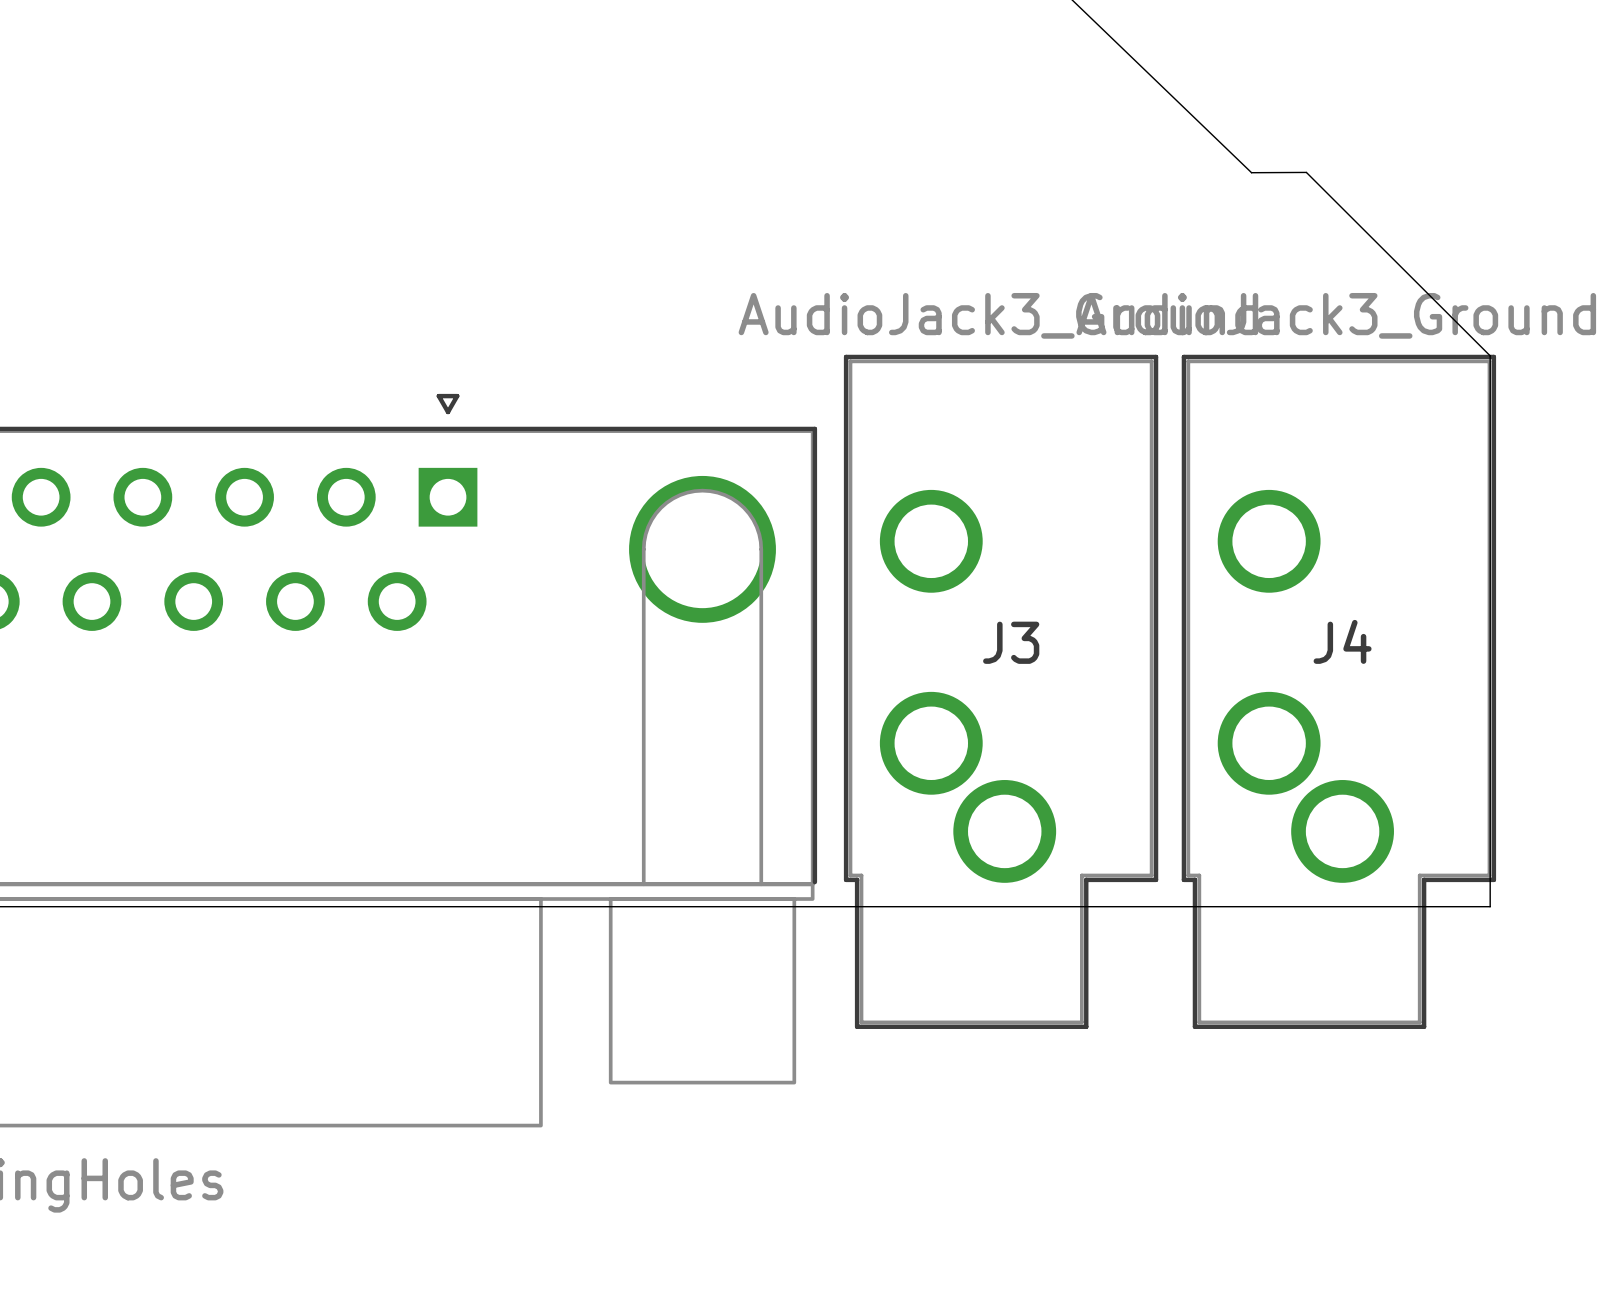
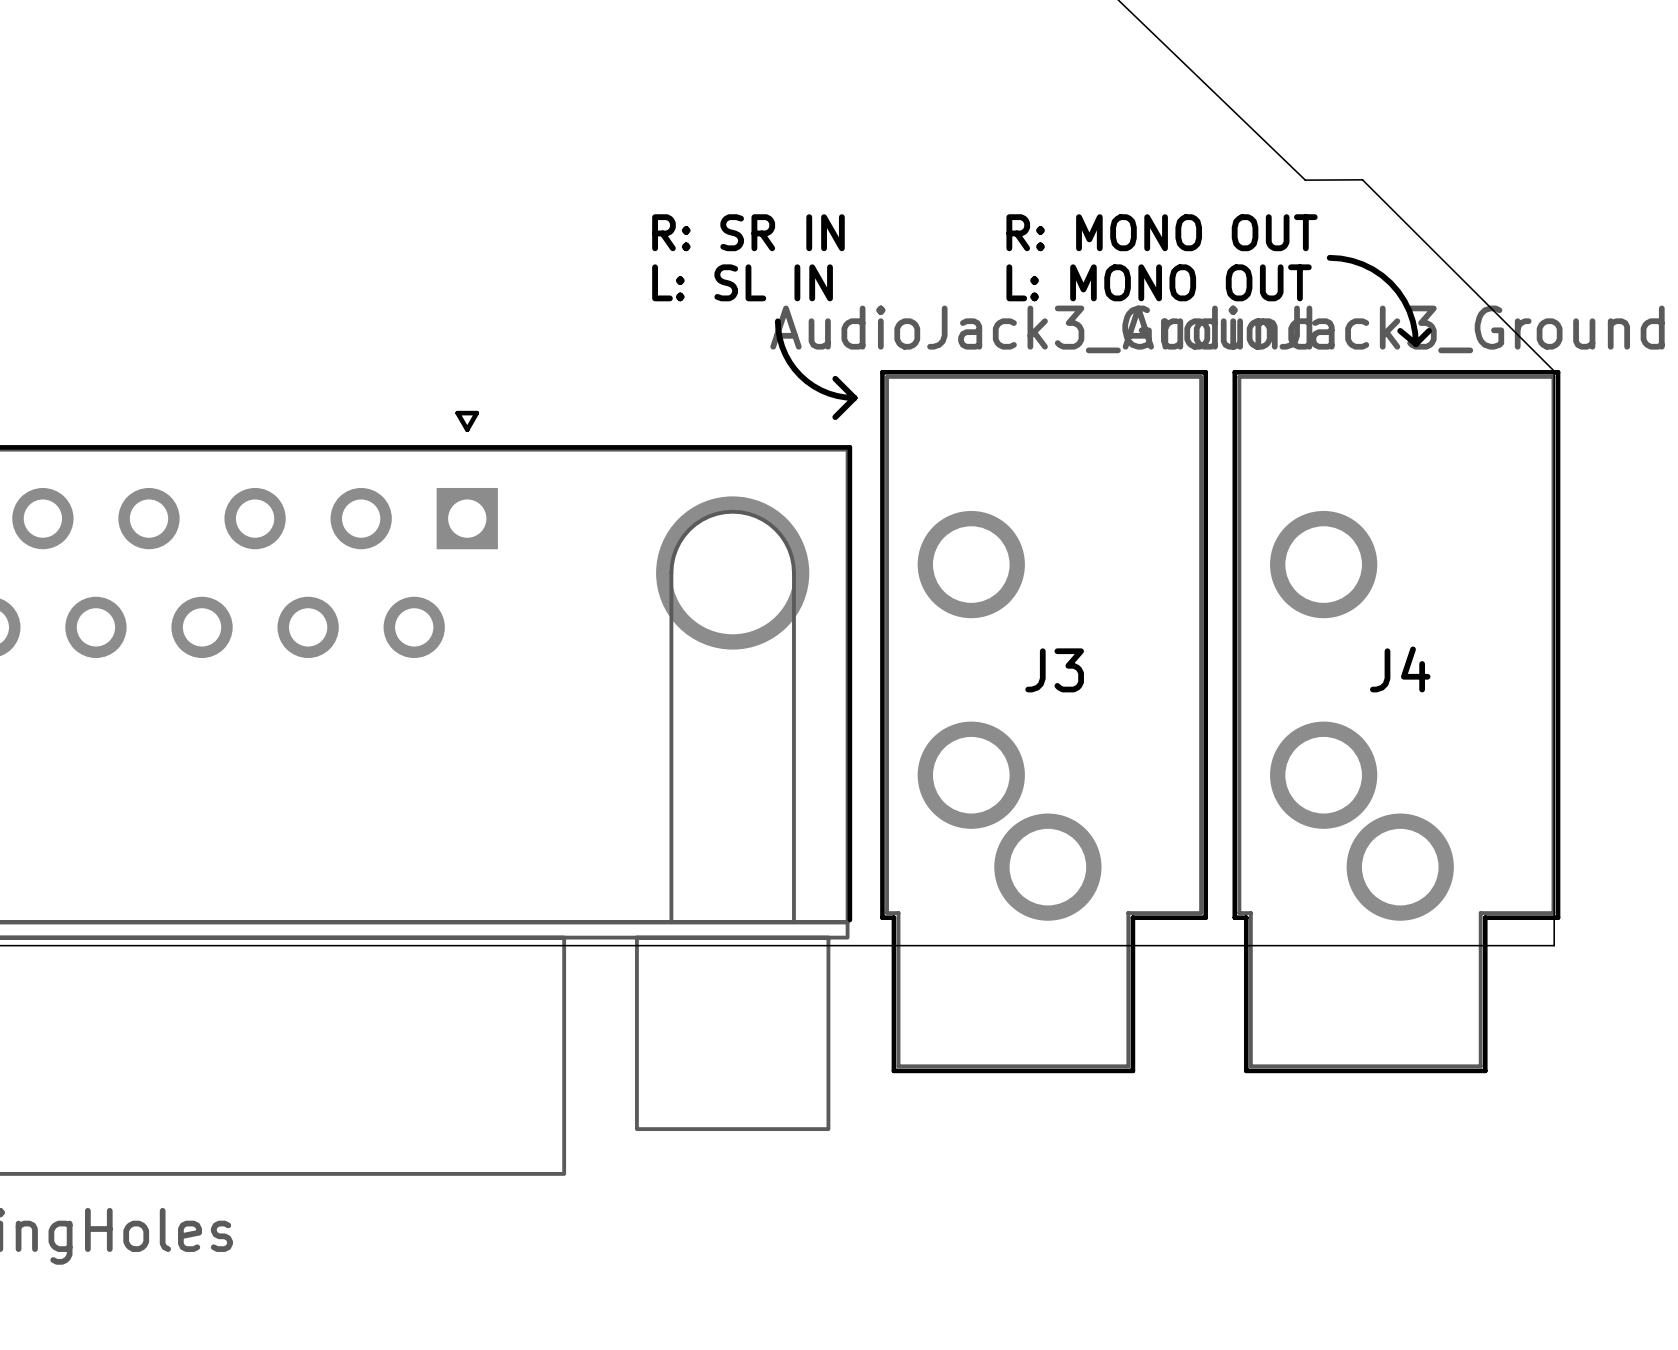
text: none -> R: SR IN (748, 232)
text: none -> R: MONO OUT (1162, 232)
line: none -> (1329, 257) (1362, 264) (1390, 283) (1409, 311) (1415, 344)
text: none -> L: SL IN (742, 282)
text: none -> L: MONO OUT (1159, 282)
line: none -> (777, 321) (779, 338) (785, 354) (800, 375) (813, 386) (829, 393) (854, 397)
line: none -> (1400, 330) (1415, 344)
line: none -> (1428, 330) (1415, 344)
line: none -> (835, 378) (854, 397)
line: none -> (854, 397) (835, 417)

